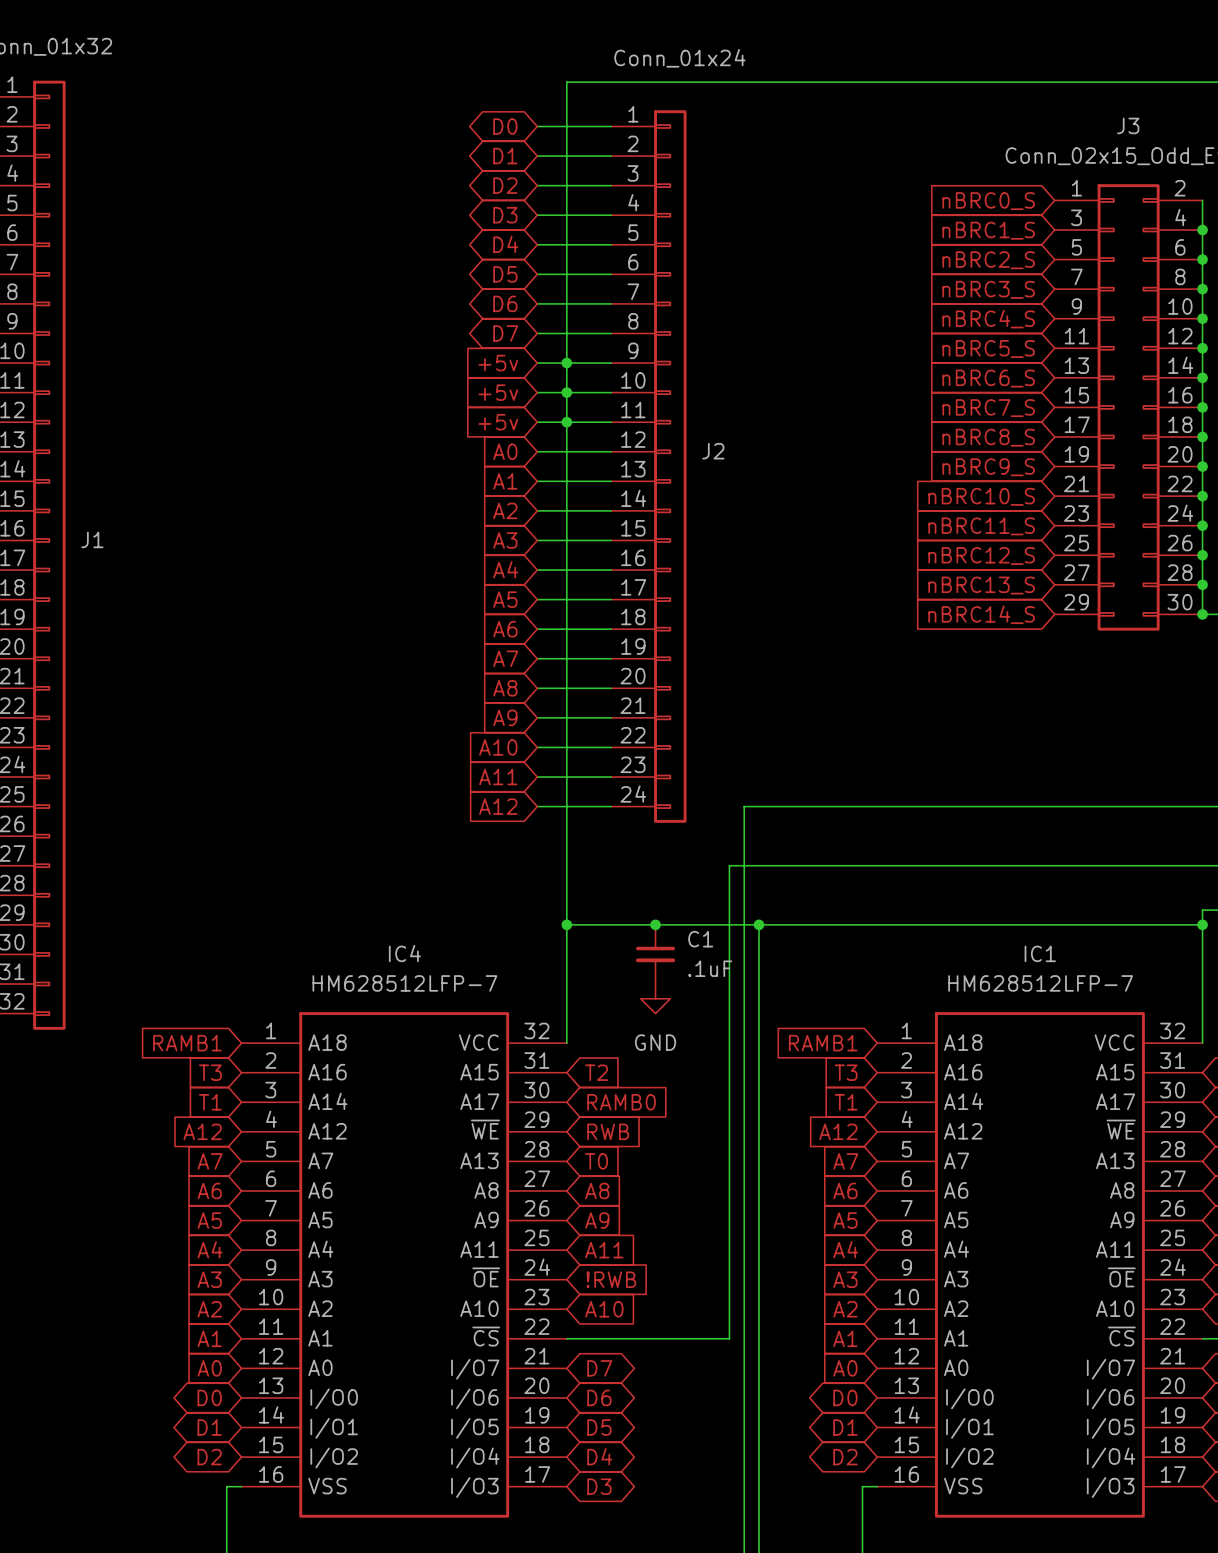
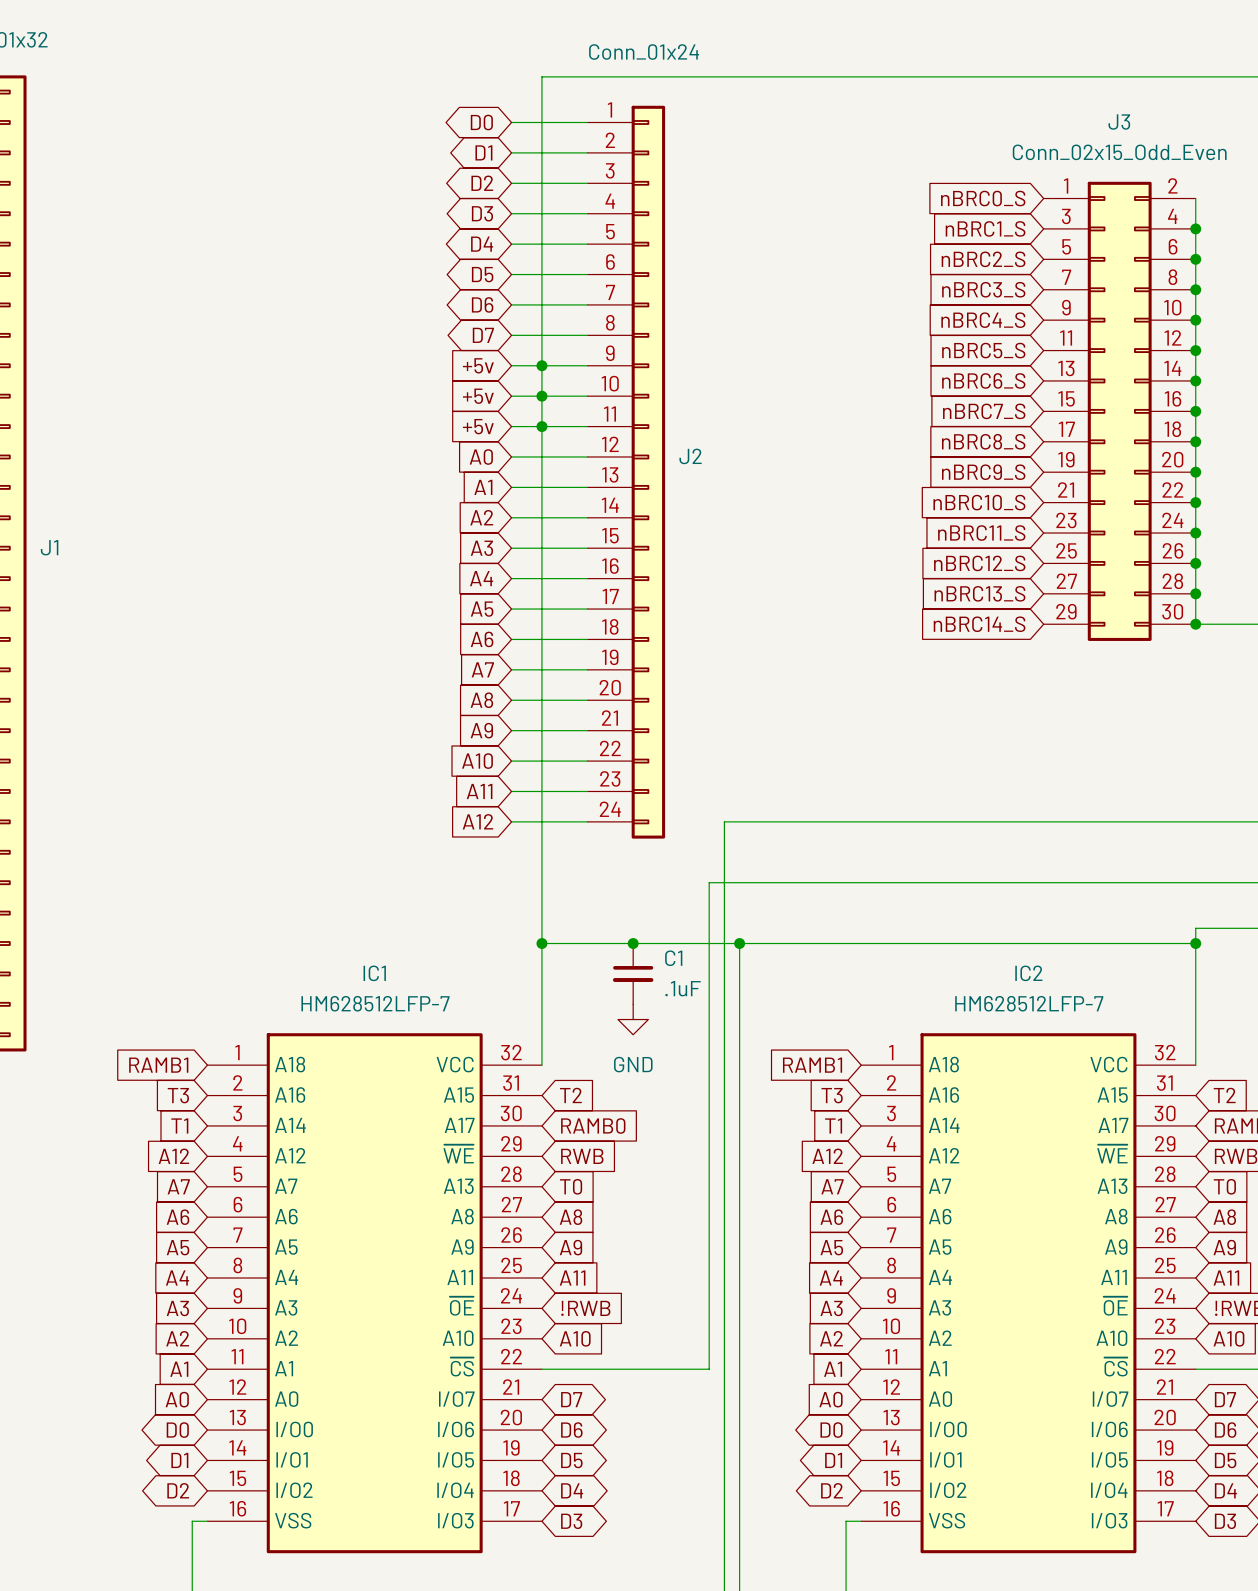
IC4 name: IC4 (404, 953) -> IC1 (374, 973)
IC1 name: IC1 (1040, 953) -> IC2 (1028, 973)

